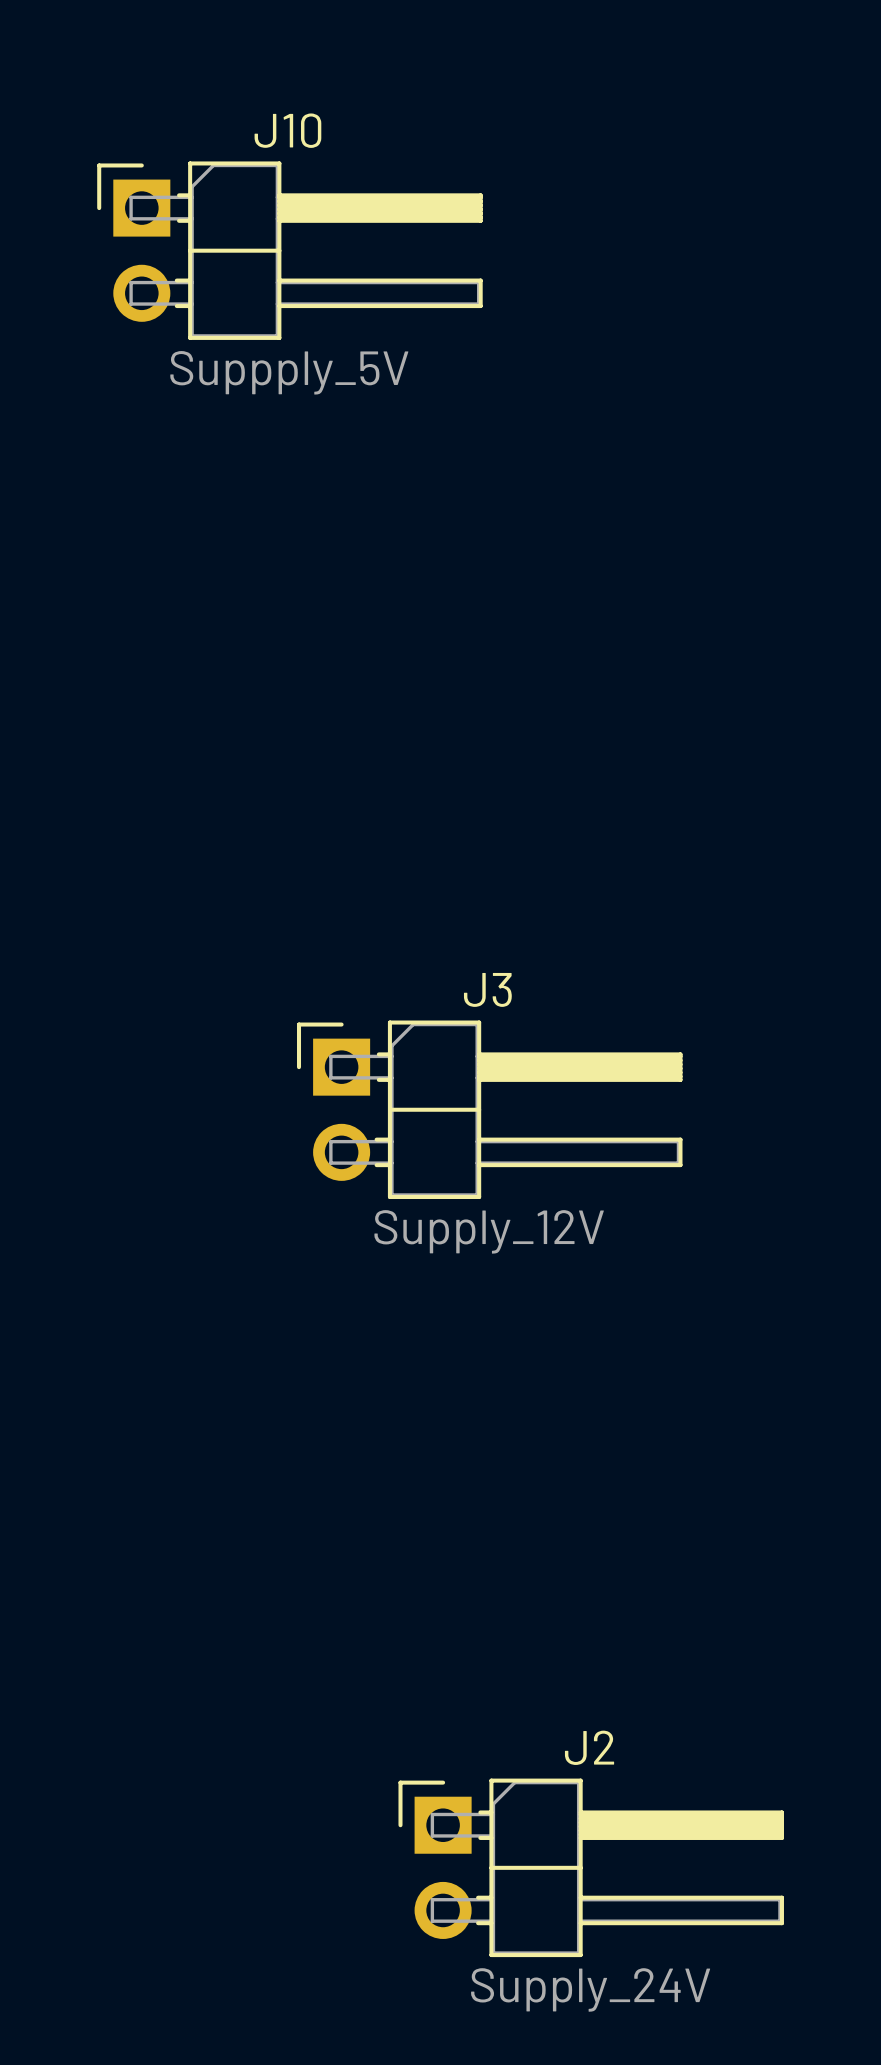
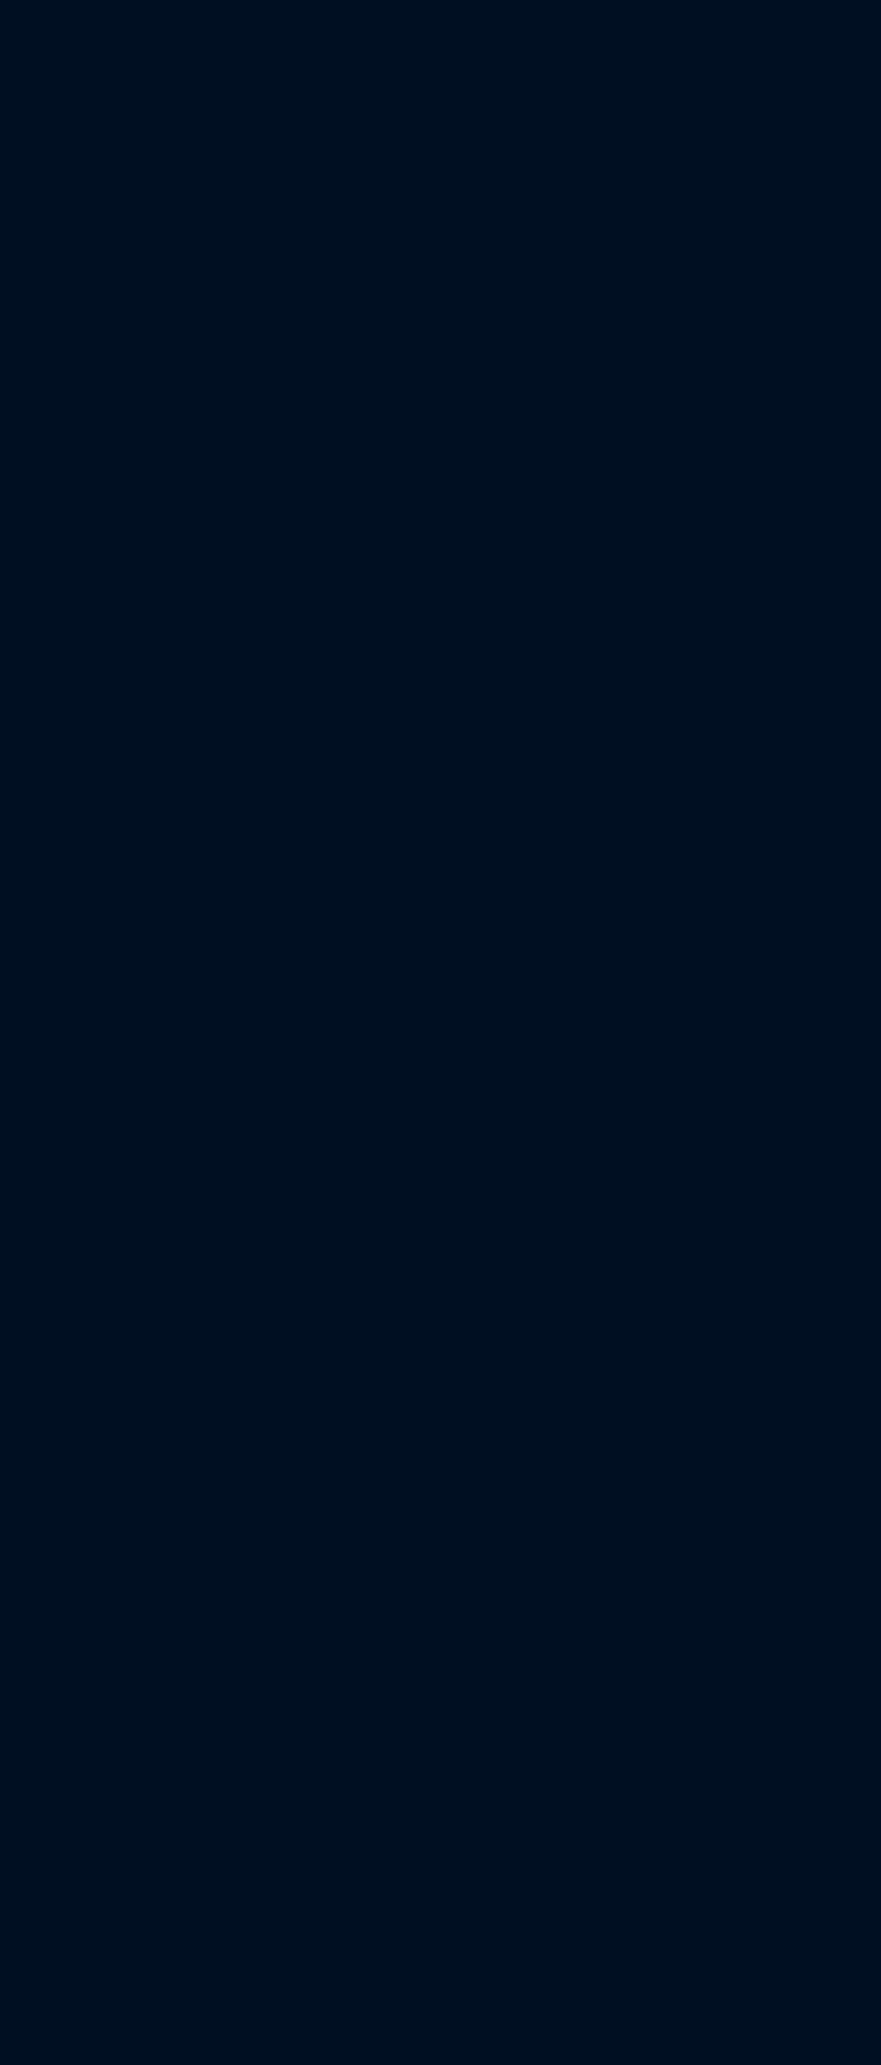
J10: Suppply_5V (289, 250) -> none
J3: Supply_12V (489, 1109) -> none
J2: Supply_24V (591, 1867) -> none

